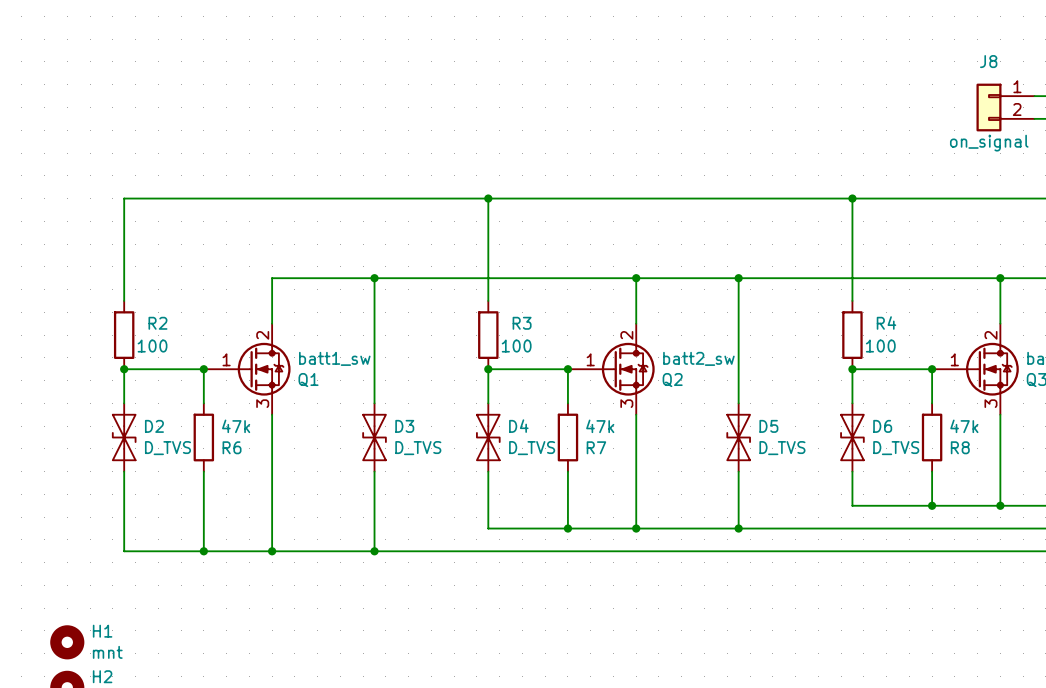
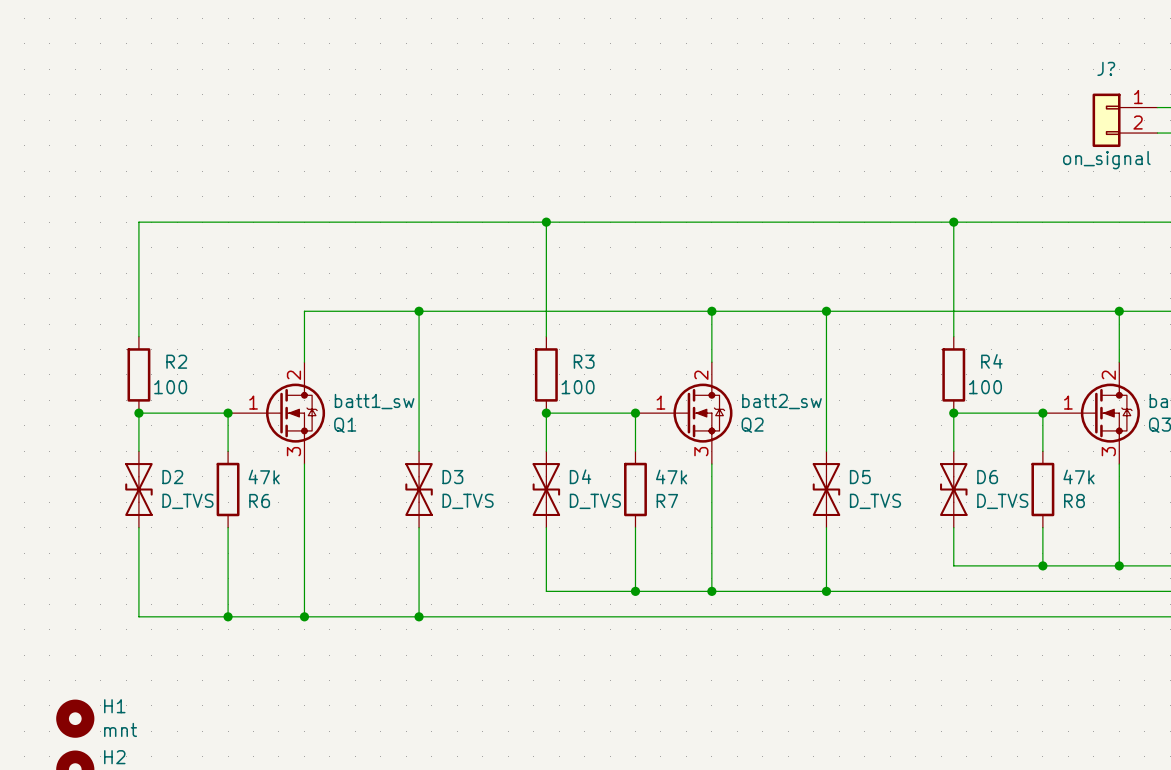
J8 name: J8 (988, 61) -> J? (1106, 68)

